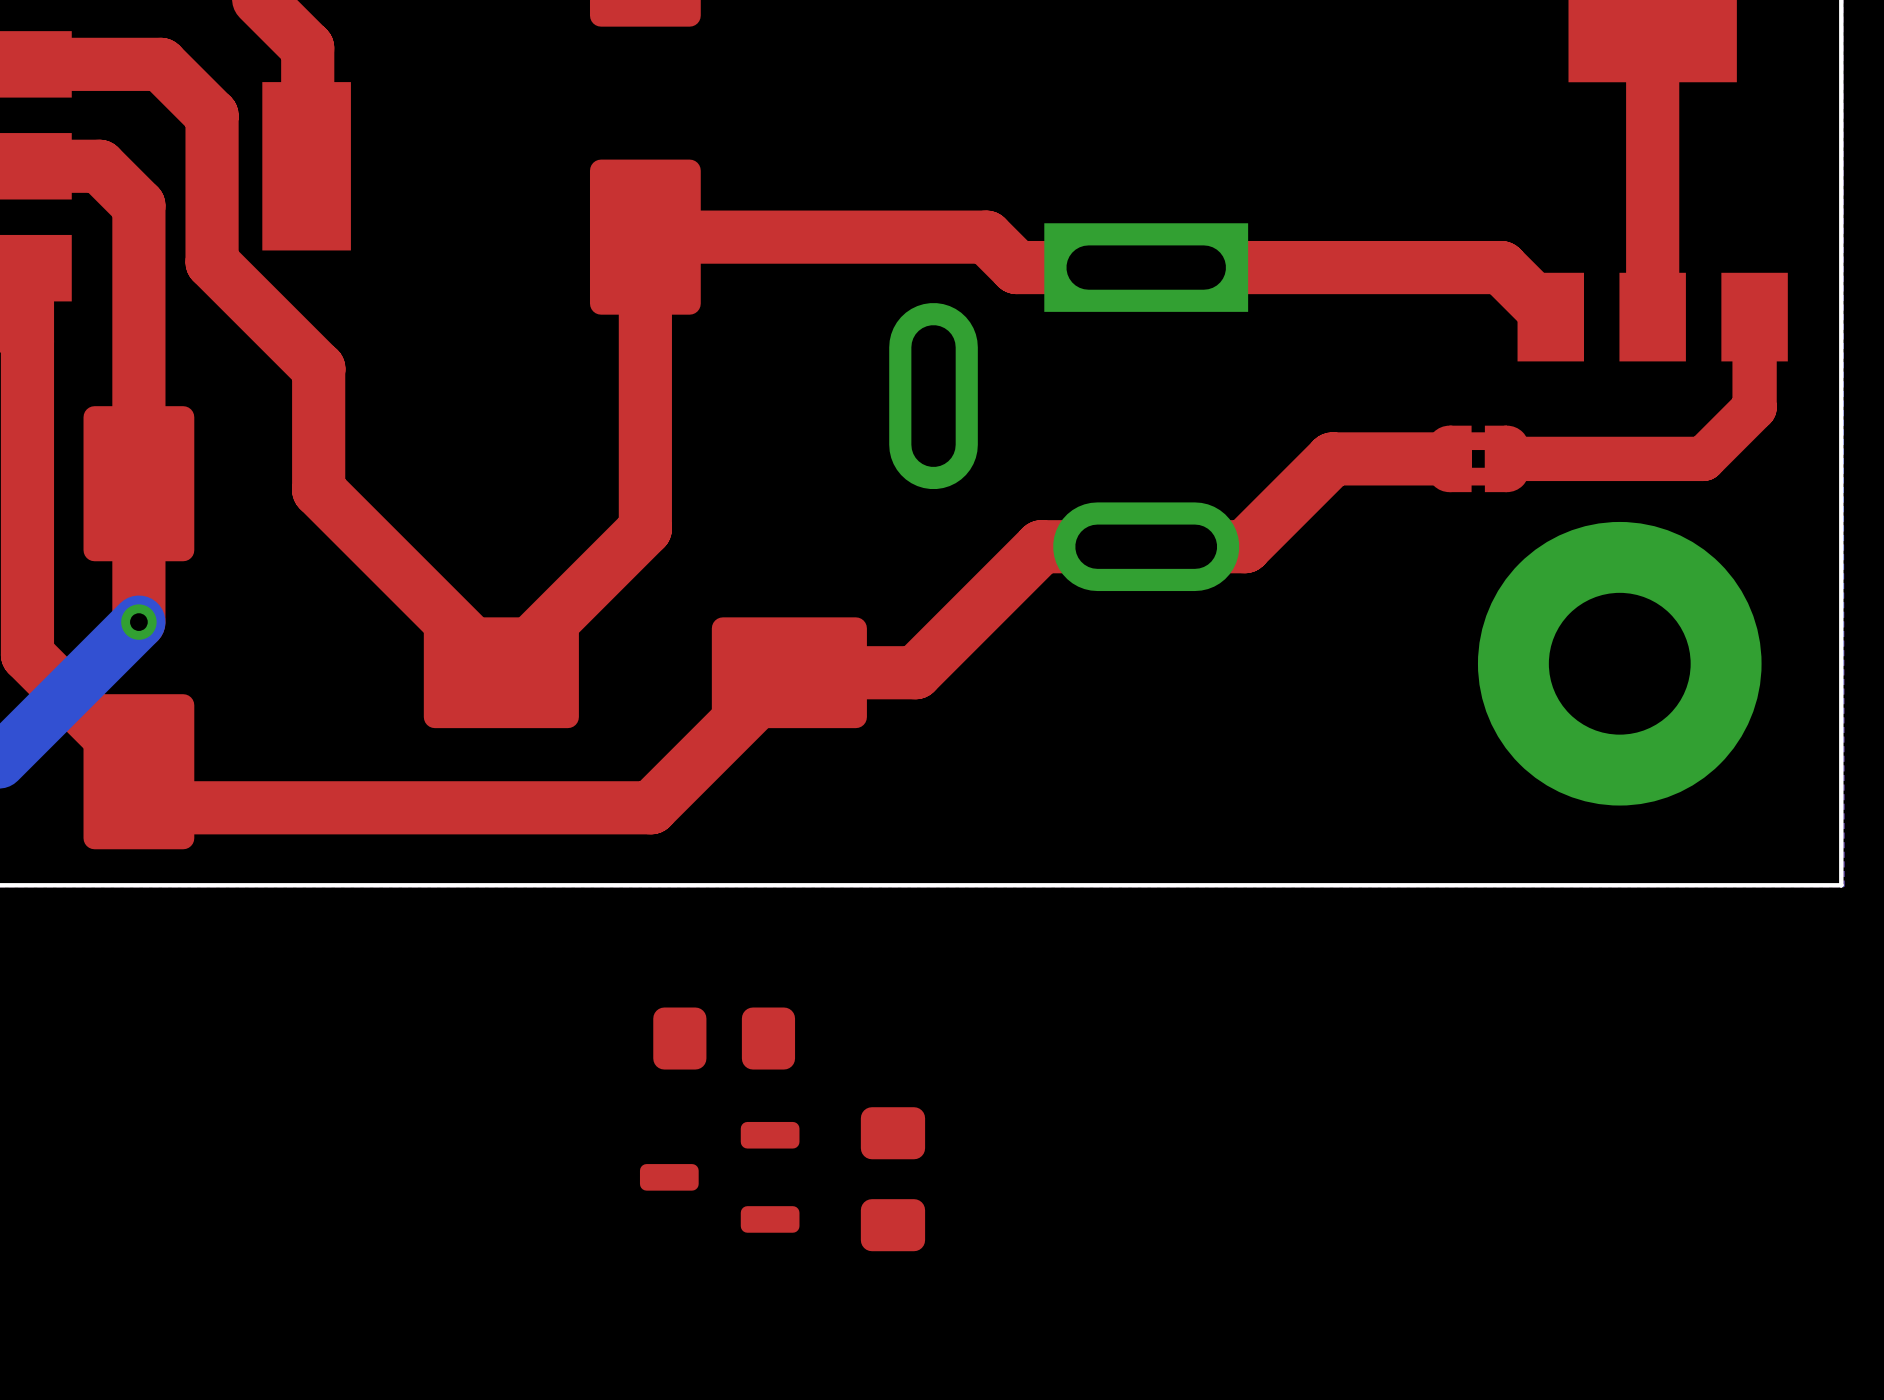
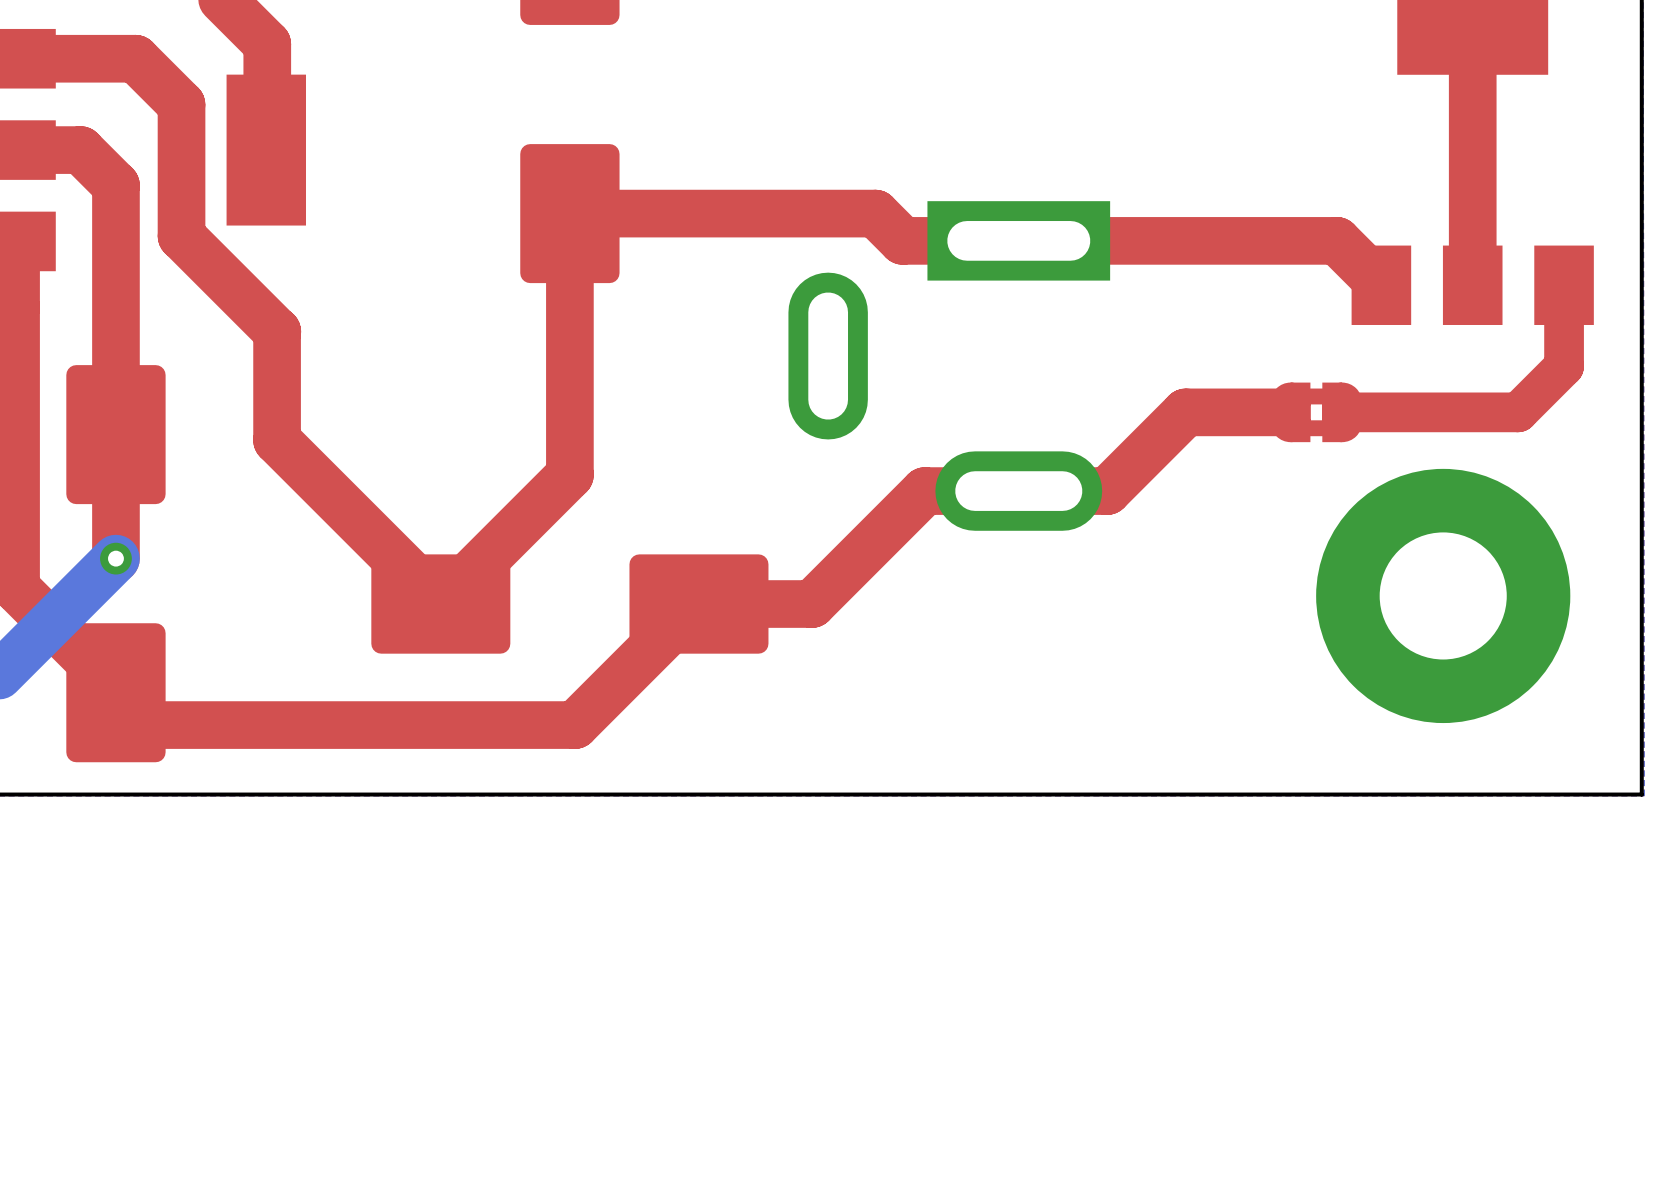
part: (724, 1038) -> none
part: (719, 1177) -> none
part: (892, 1179) -> none

